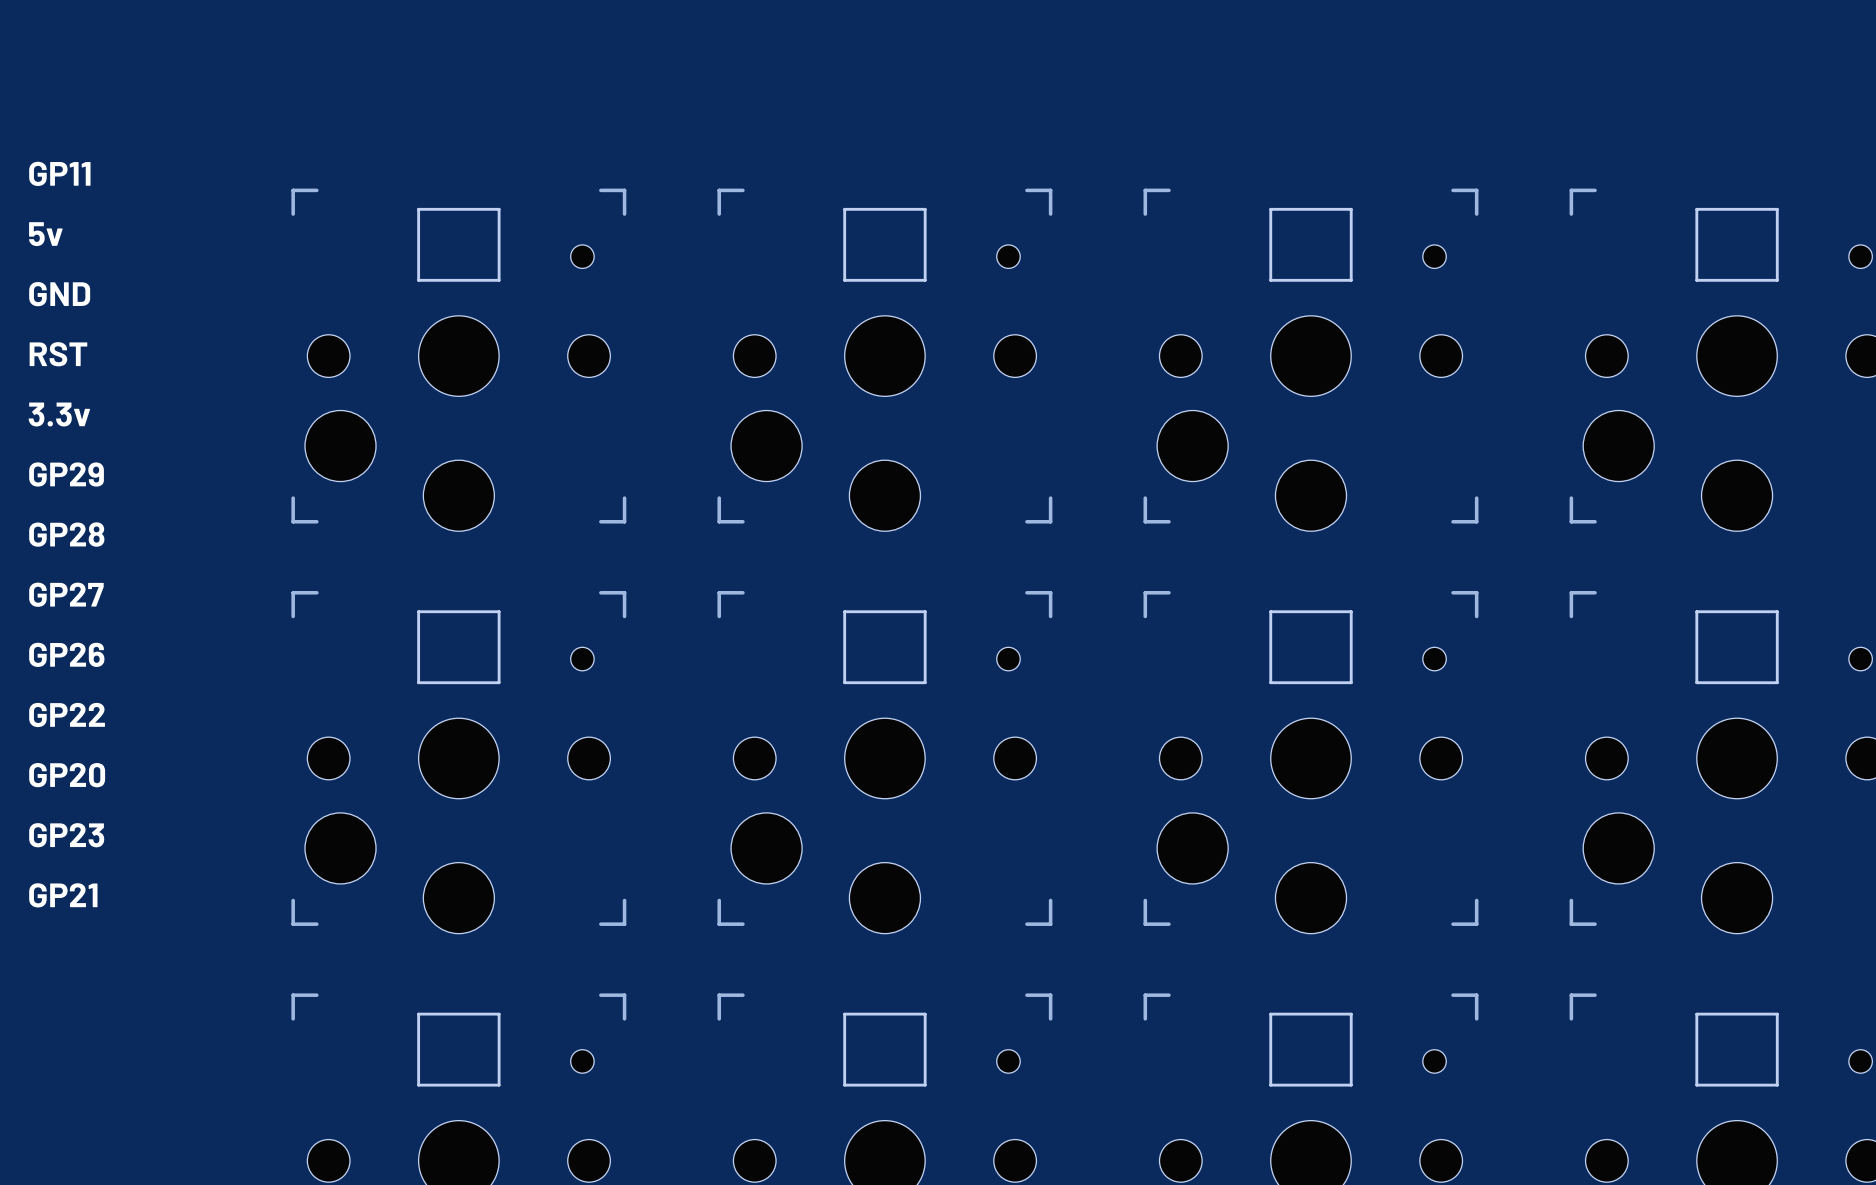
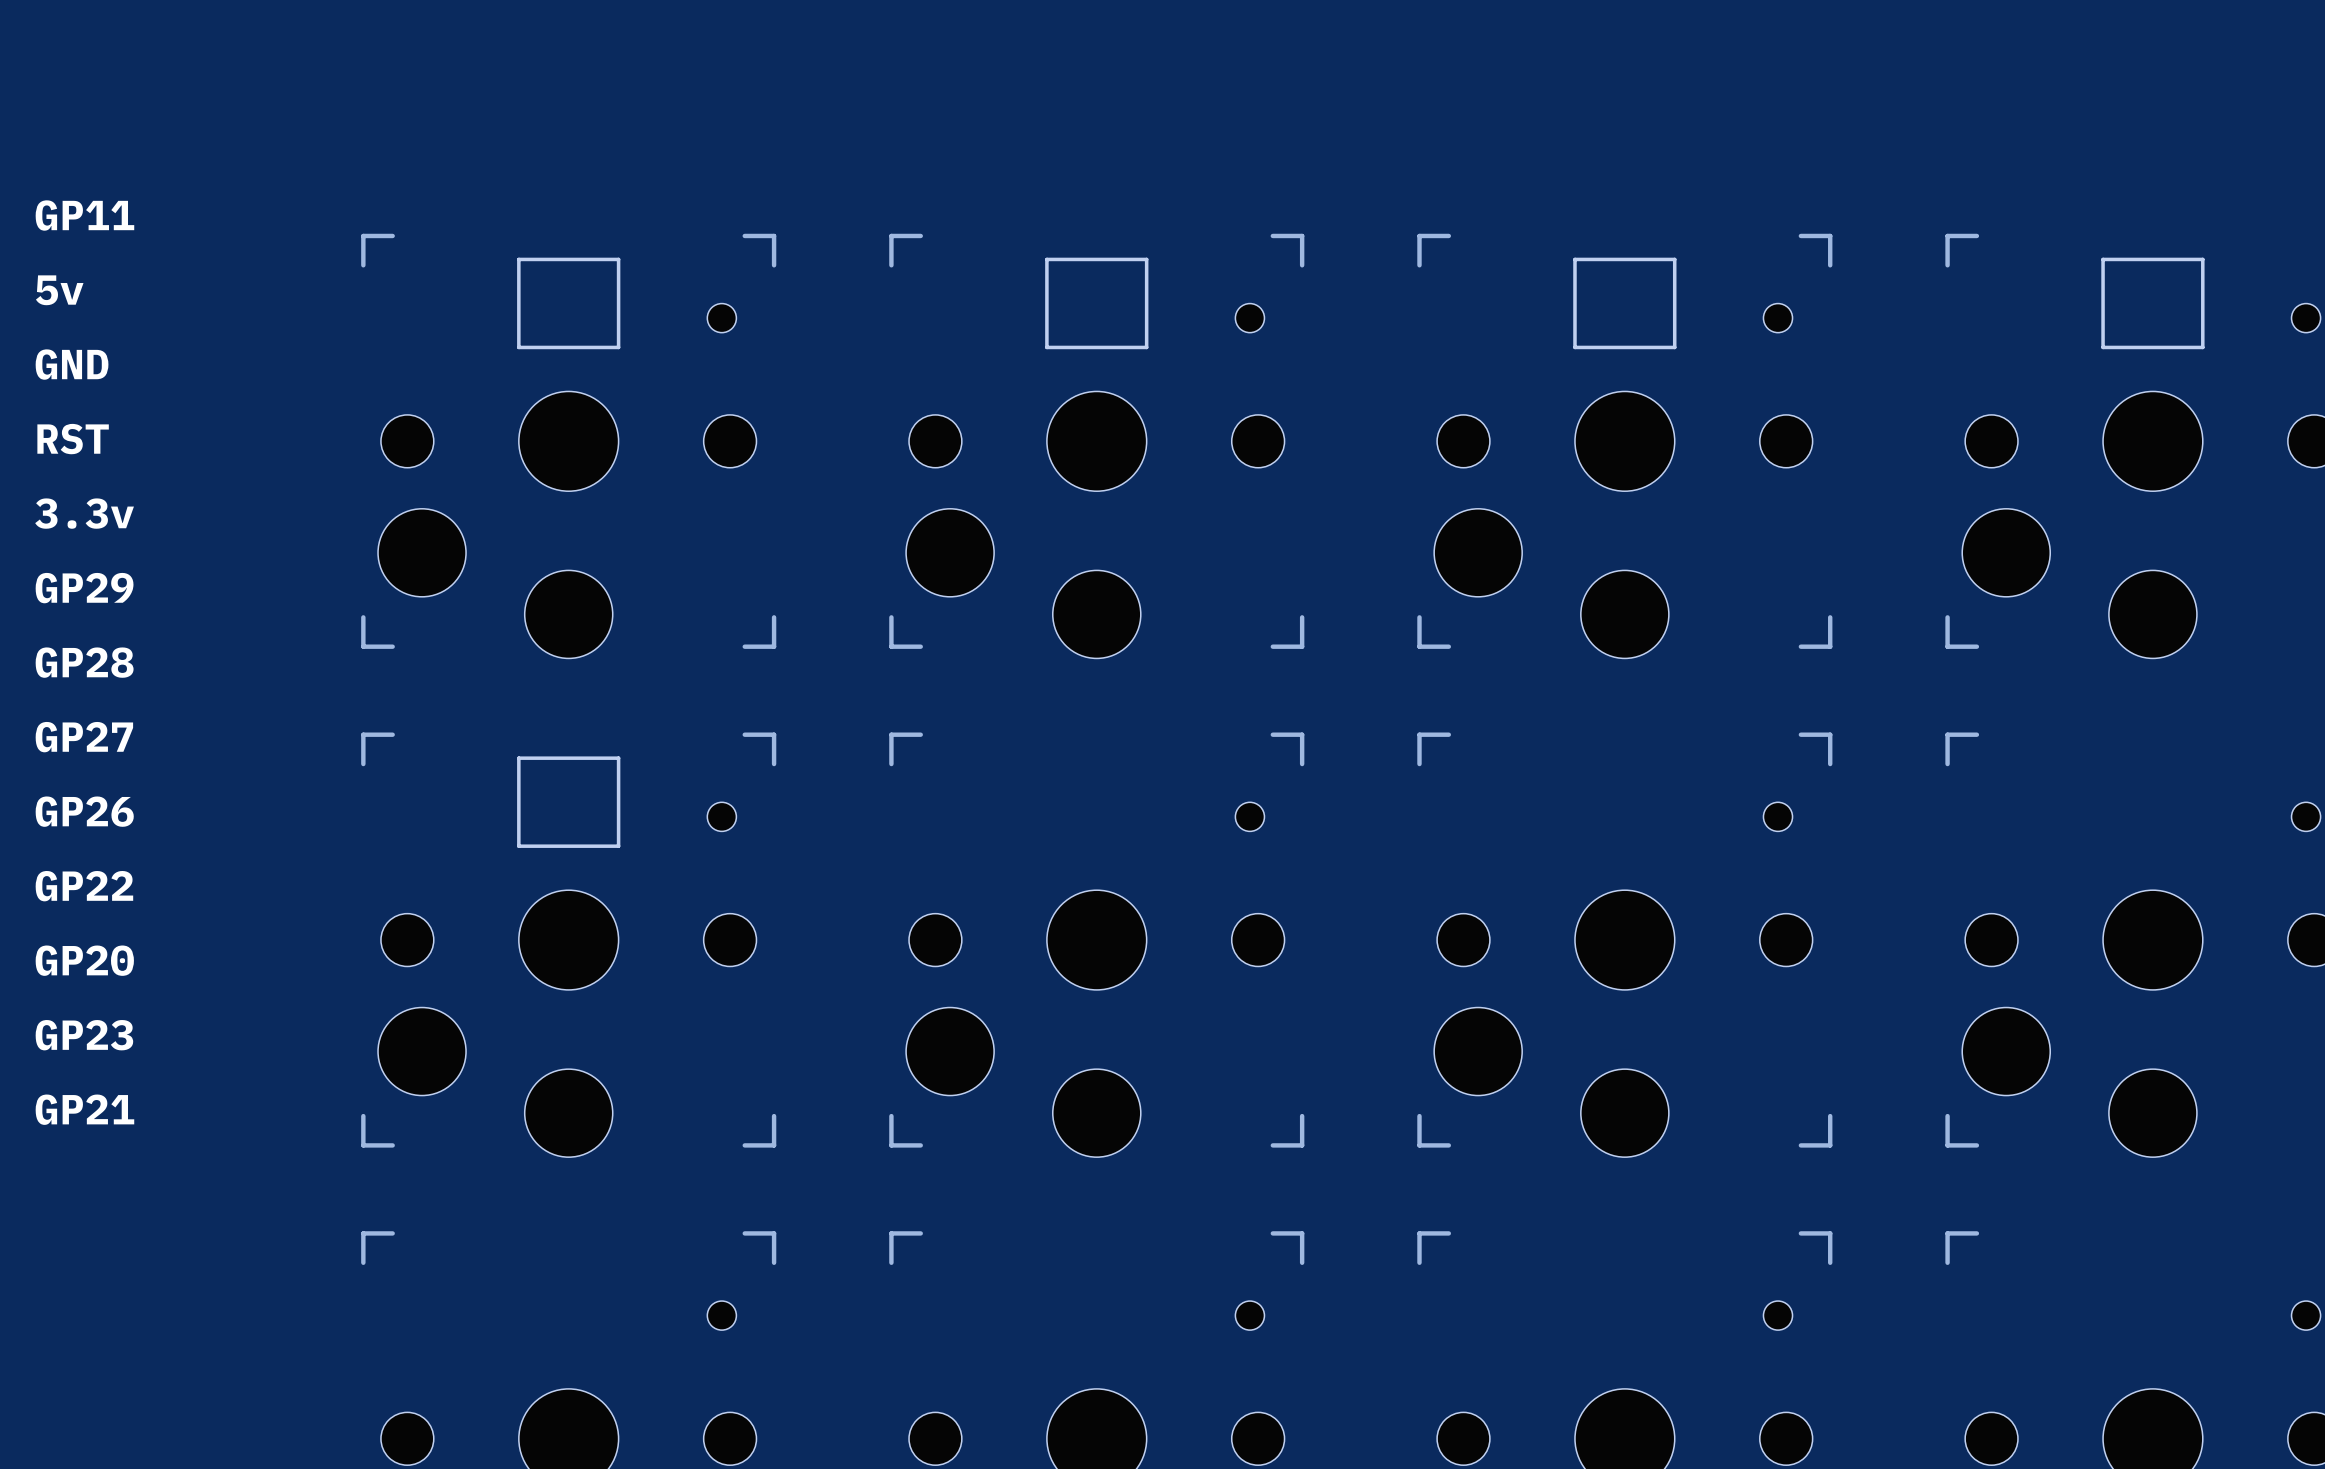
part: (884, 647) -> none
part: (1310, 647) -> none
part: (1737, 647) -> none
part: (458, 1049) -> none
part: (884, 1049) -> none
part: (1310, 1049) -> none
part: (1737, 1049) -> none

